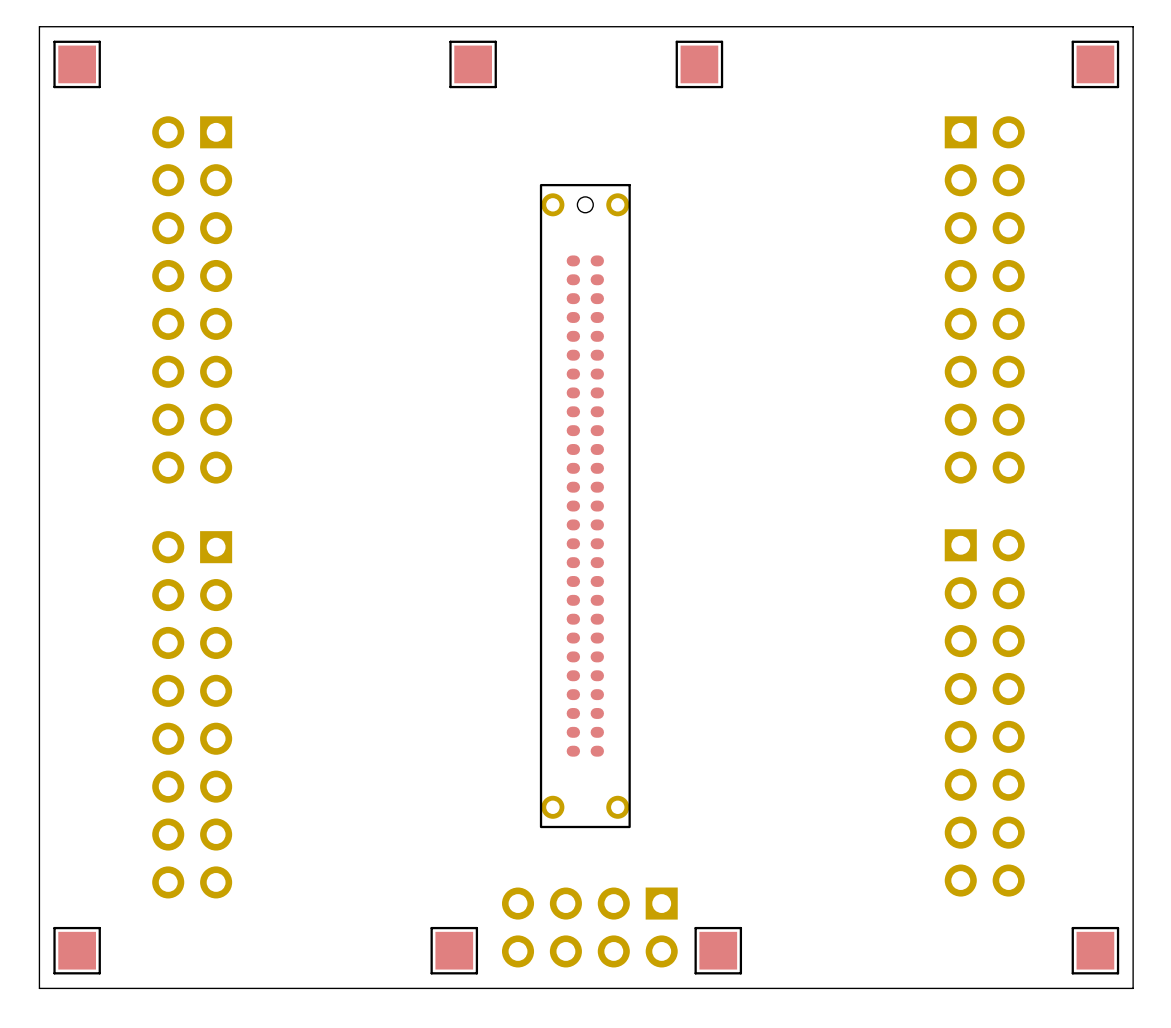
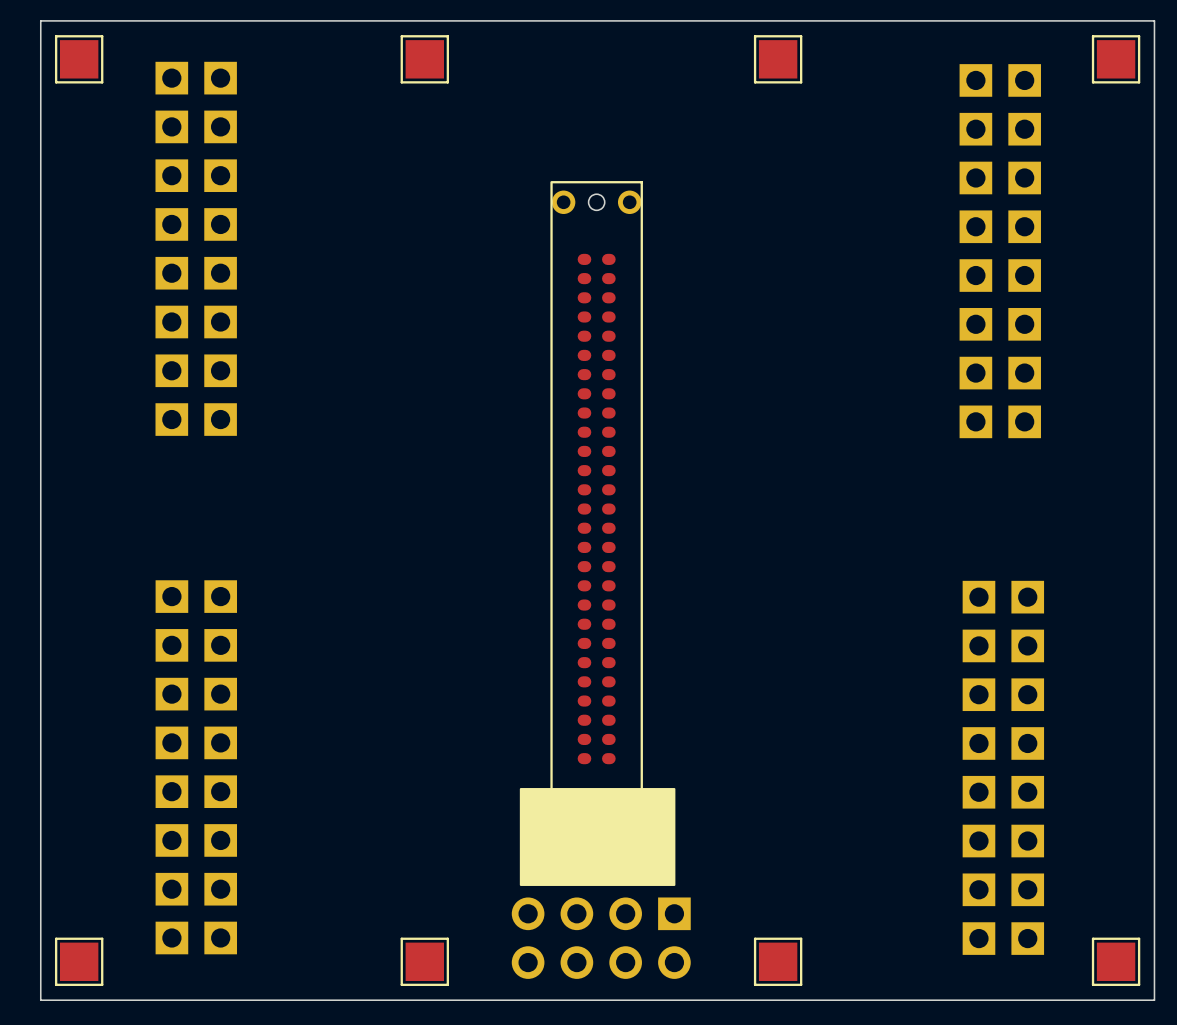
part position: (473, 64) -> (424, 59)
part position: (699, 64) -> (778, 59)
part: none -> (196, 248)
part: none -> (1000, 251)
part: (192, 299) -> none
part: (984, 299) -> none
part: (984, 712) -> none
part: (192, 714) -> none
part: none -> (196, 767)
part: none -> (1003, 767)
drawing: none -> [519, 788, 676, 886]
part position: (454, 950) -> (424, 961)
part position: (718, 950) -> (778, 961)

